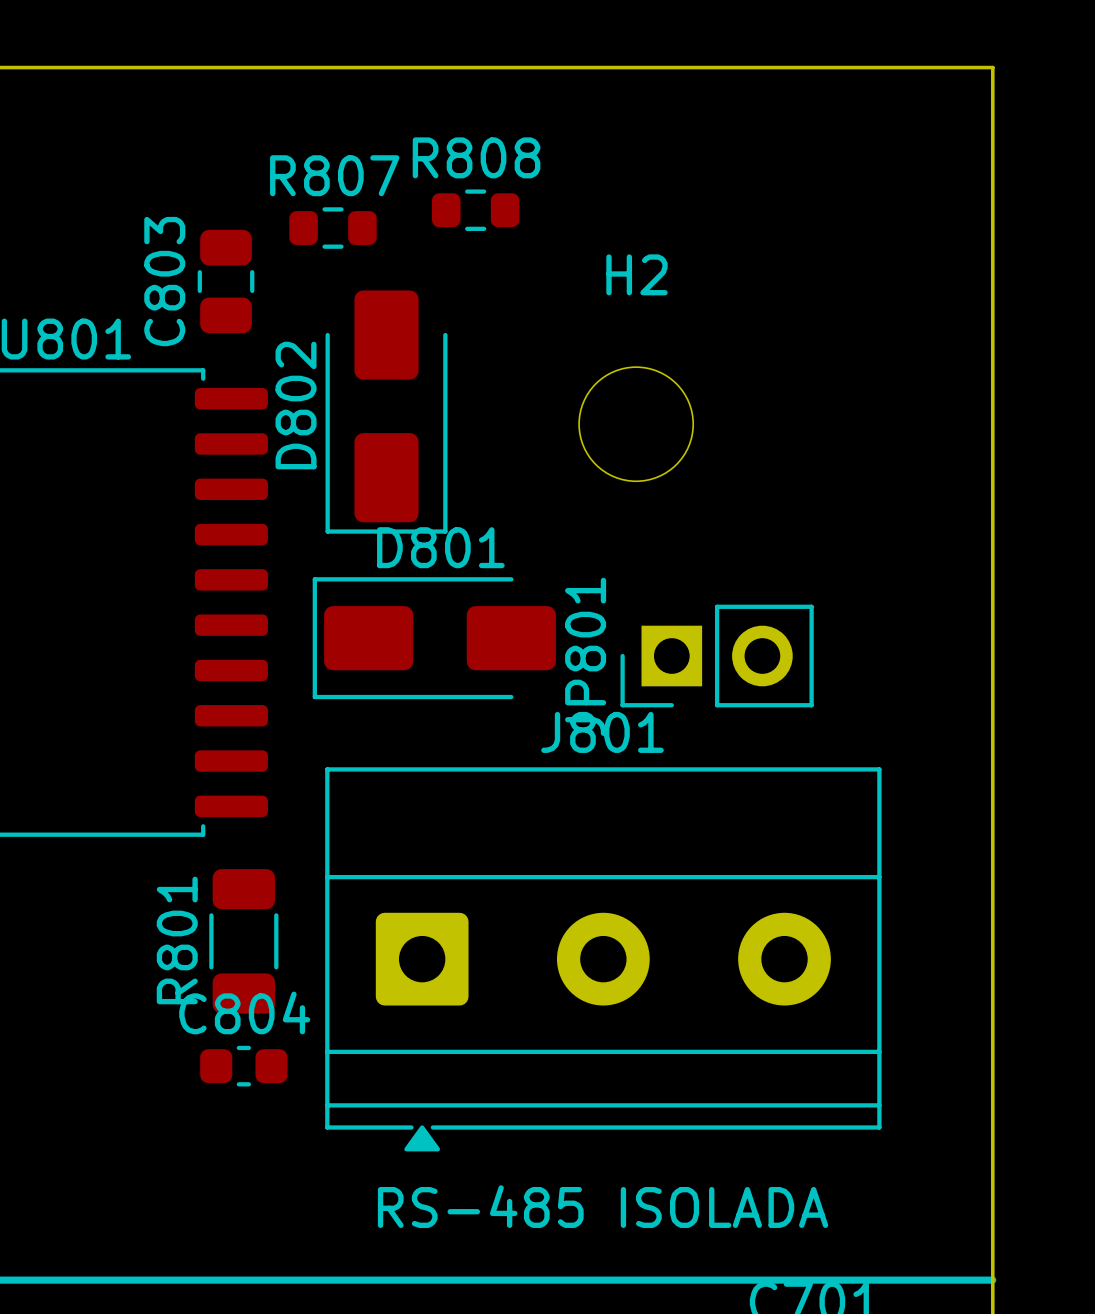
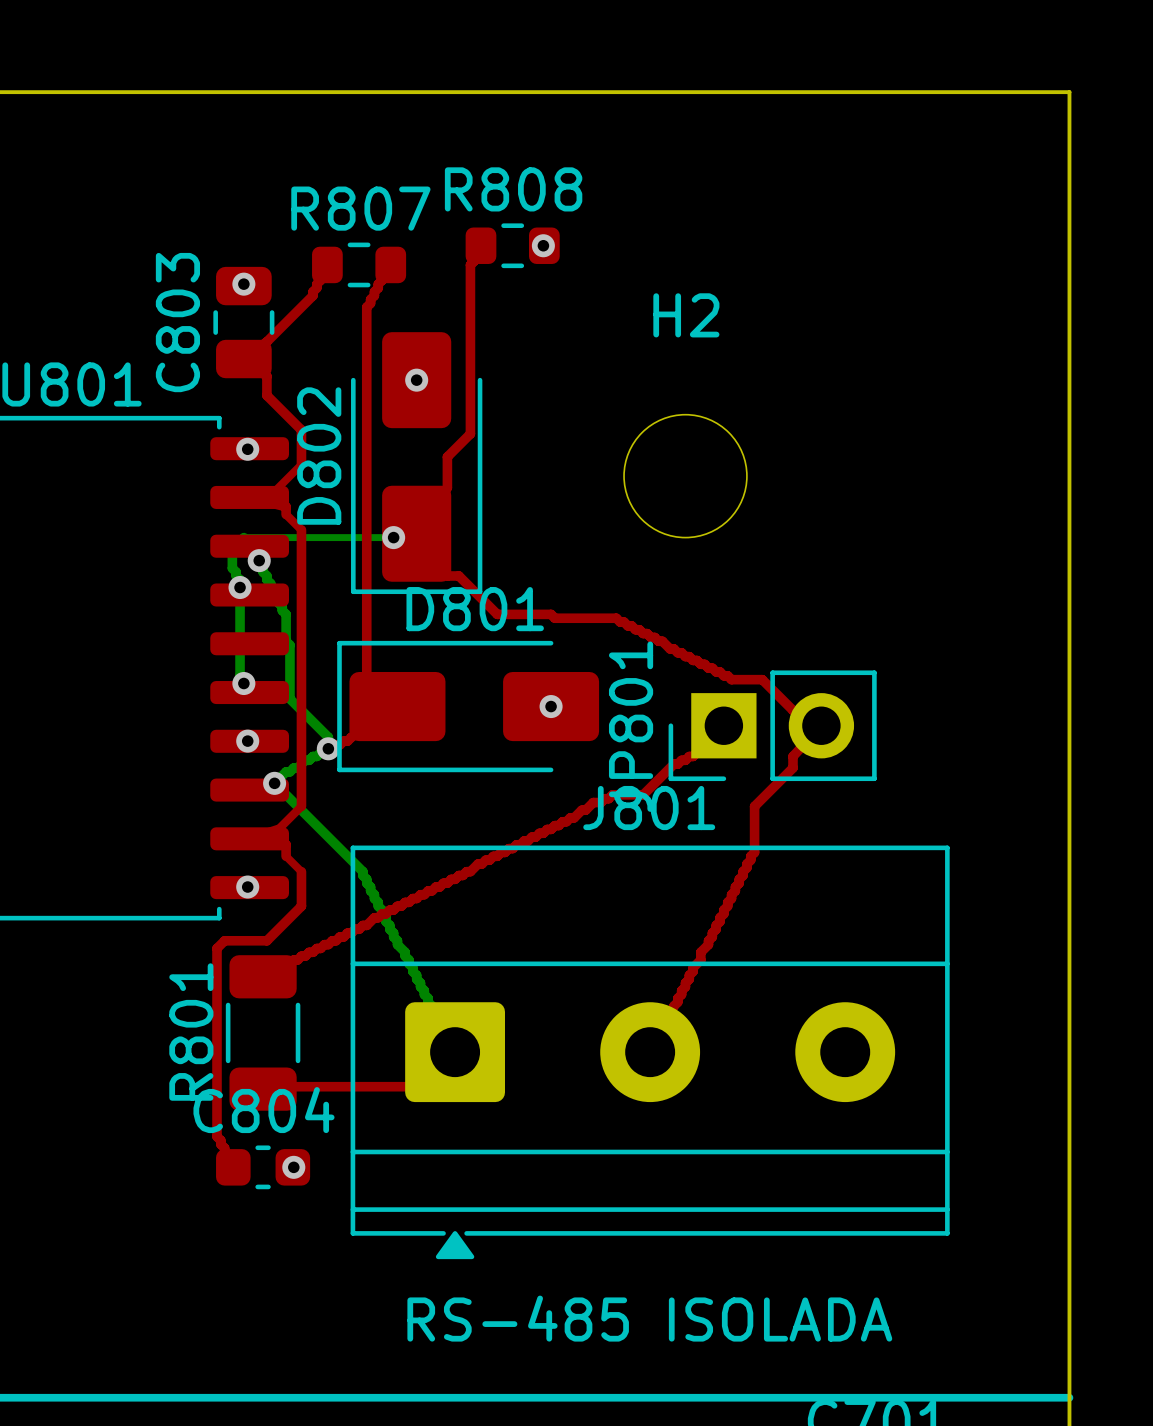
top track: none -> (480, 245) (474, 261) (470, 264) (470, 433) (447, 456) (447, 487) (416, 533)
via: none -> (543, 245)
top track: none -> (327, 264) (320, 280) (316, 284) (316, 287) (312, 291) (312, 295) (266, 341) (243, 359) (266, 376) (266, 395) (301, 430) (301, 464) (274, 491) (249, 497) (286, 506) (286, 514) (301, 529) (301, 806) (278, 829) (249, 838) (286, 844) (286, 856) (301, 871) (301, 906) (266, 940) (224, 940) (216, 948) (216, 1136) (220, 1140) (220, 1144) (224, 1148) (224, 1151) (233, 1167)
top track: none -> (390, 264) (366, 307) (366, 675) (397, 706) (347, 741) (328, 748)
via: none -> (243, 284)
via: none -> (416, 380)
via: none -> (247, 449)
top track: none -> (416, 533) (447, 575) (458, 575) (497, 614) (551, 614) (554, 618) (616, 618) (650, 637) (662, 641) (670, 648) (681, 652) (693, 660) (696, 660) (731, 679) (762, 679) (792, 710) (821, 725) (792, 756) (792, 767) (754, 806) (754, 852) (750, 856) (750, 860) (743, 871) (735, 890) (731, 894) (731, 898) (723, 910) (716, 929) (708, 940) (708, 944) (700, 952) (700, 959) (693, 967) (689, 979) (677, 998) (677, 1002) (650, 1052)
bottom track: none -> (393, 537) (243, 537) (236, 545) (236, 549) (232, 552) (232, 568) (240, 579) (240, 675) (243, 679) (243, 683)
via: none -> (393, 537)
bottom track: none -> (259, 560) (266, 579) (270, 583) (270, 587) (286, 614) (286, 641) (289, 645) (289, 698) (328, 737) (328, 748) (324, 752) (305, 760) (297, 767) (286, 771) (274, 783) (362, 871) (362, 875) (370, 887) (378, 906) (385, 917) (385, 921) (397, 940) (397, 944) (405, 952) (405, 956) (408, 959) (408, 963) (412, 967) (412, 971) (424, 990) (424, 994) (428, 998) (428, 1002) (432, 1006) (455, 1052)
via: none -> (259, 560)
via: none -> (240, 587)
via: none -> (243, 683)
via: none -> (551, 706)
top track: none -> (723, 725) (693, 756) (673, 764) (643, 794) (612, 794) (600, 802) (593, 802) (574, 817) (570, 817) (566, 821) (554, 825) (543, 833) (539, 833) (504, 852) (501, 852) (489, 860) (478, 863) (470, 871) (466, 871) (447, 883) (443, 883) (408, 902) (405, 902) (401, 906) (382, 913) (378, 917) (374, 917) (366, 925) (362, 925) (359, 929) (355, 929) (351, 933) (347, 933) (343, 936) (339, 936) (336, 940) (332, 940) (328, 944) (324, 944) (320, 948) (316, 948) (312, 952) (309, 952) (305, 956) (301, 956) (297, 959) (293, 959) (263, 976)
via: none -> (247, 741)
via: none -> (328, 748)
via: none -> (274, 783)
via: none -> (247, 887)
top track: none -> (455, 1052) (408, 1086) (293, 1086) (263, 1089)
via: none -> (293, 1167)

